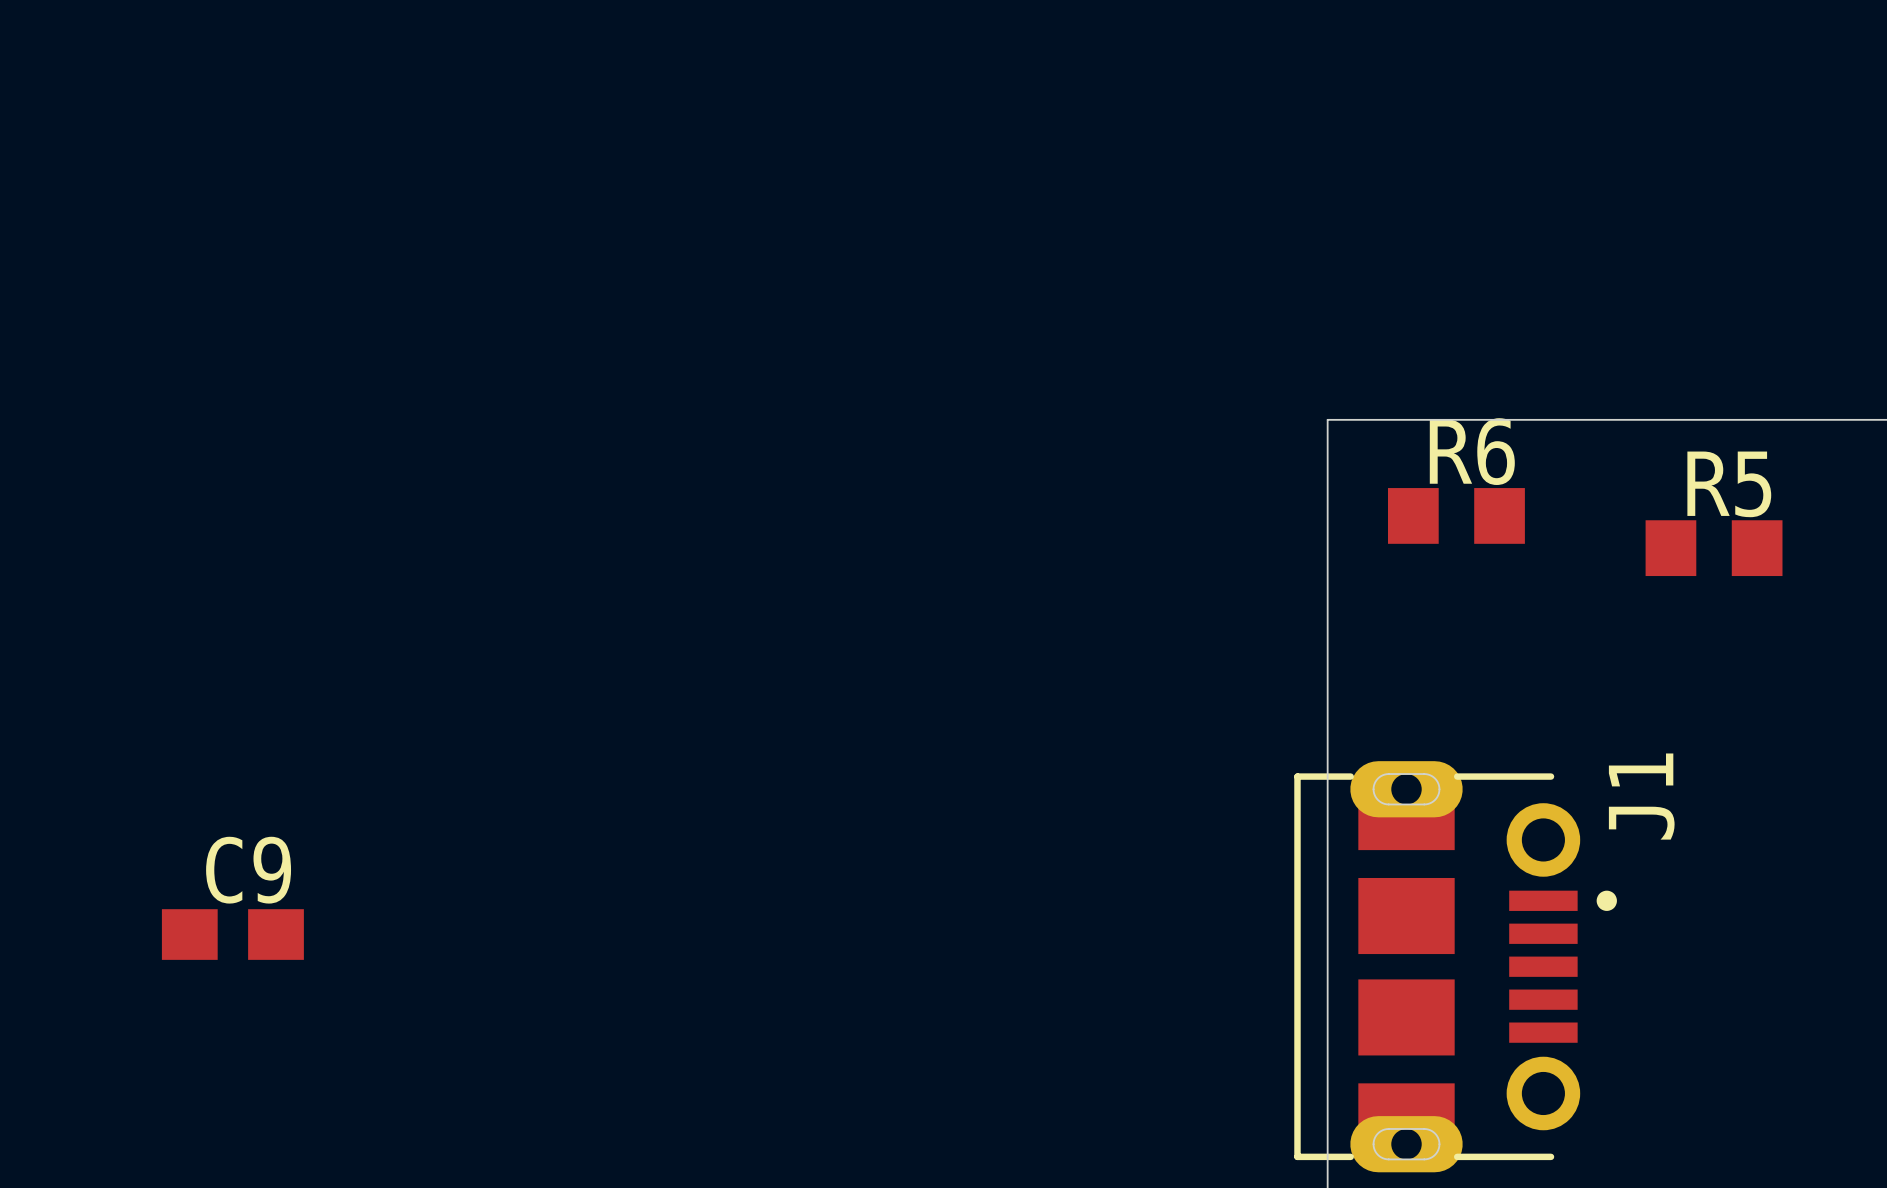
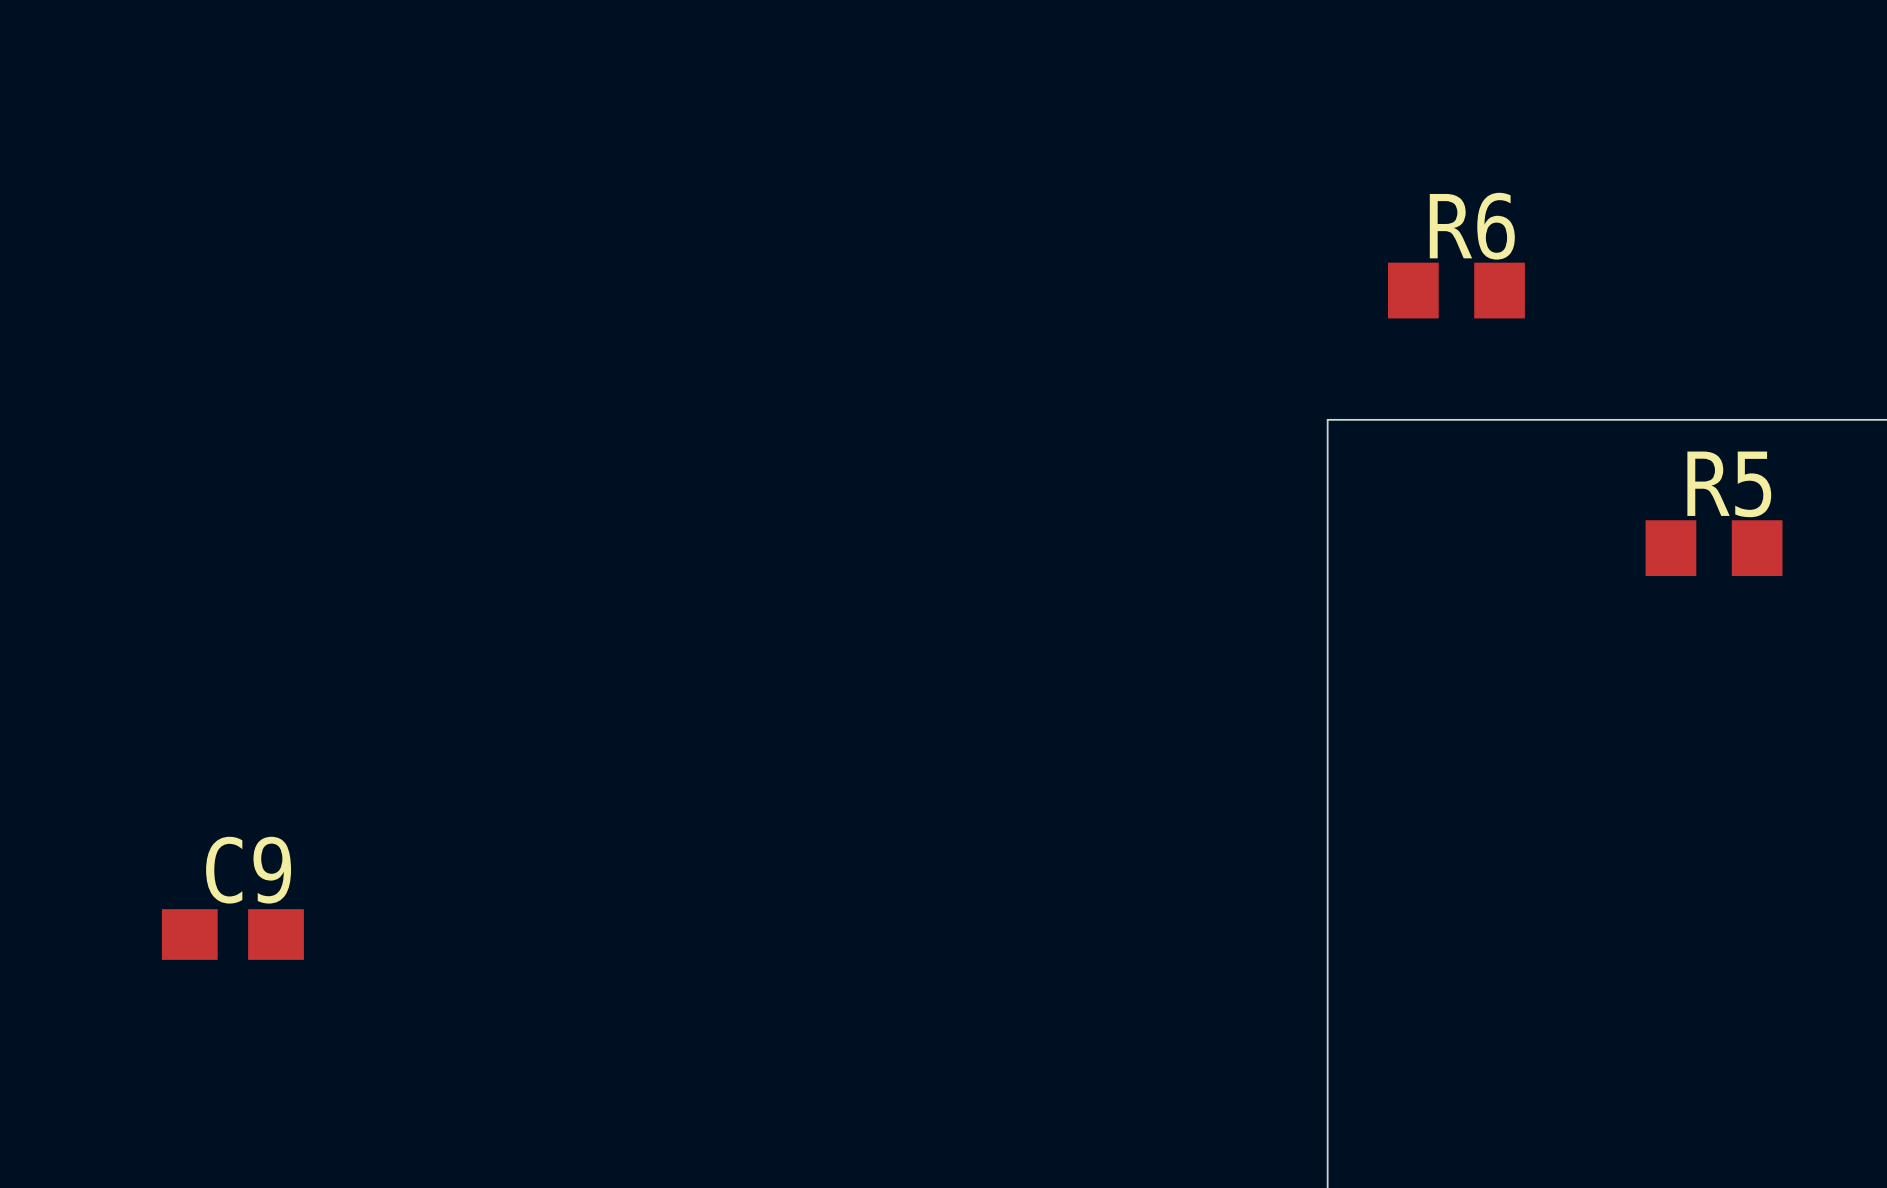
R6 position: (1456, 515) -> (1456, 290)
J1: (1455, 966) -> none

